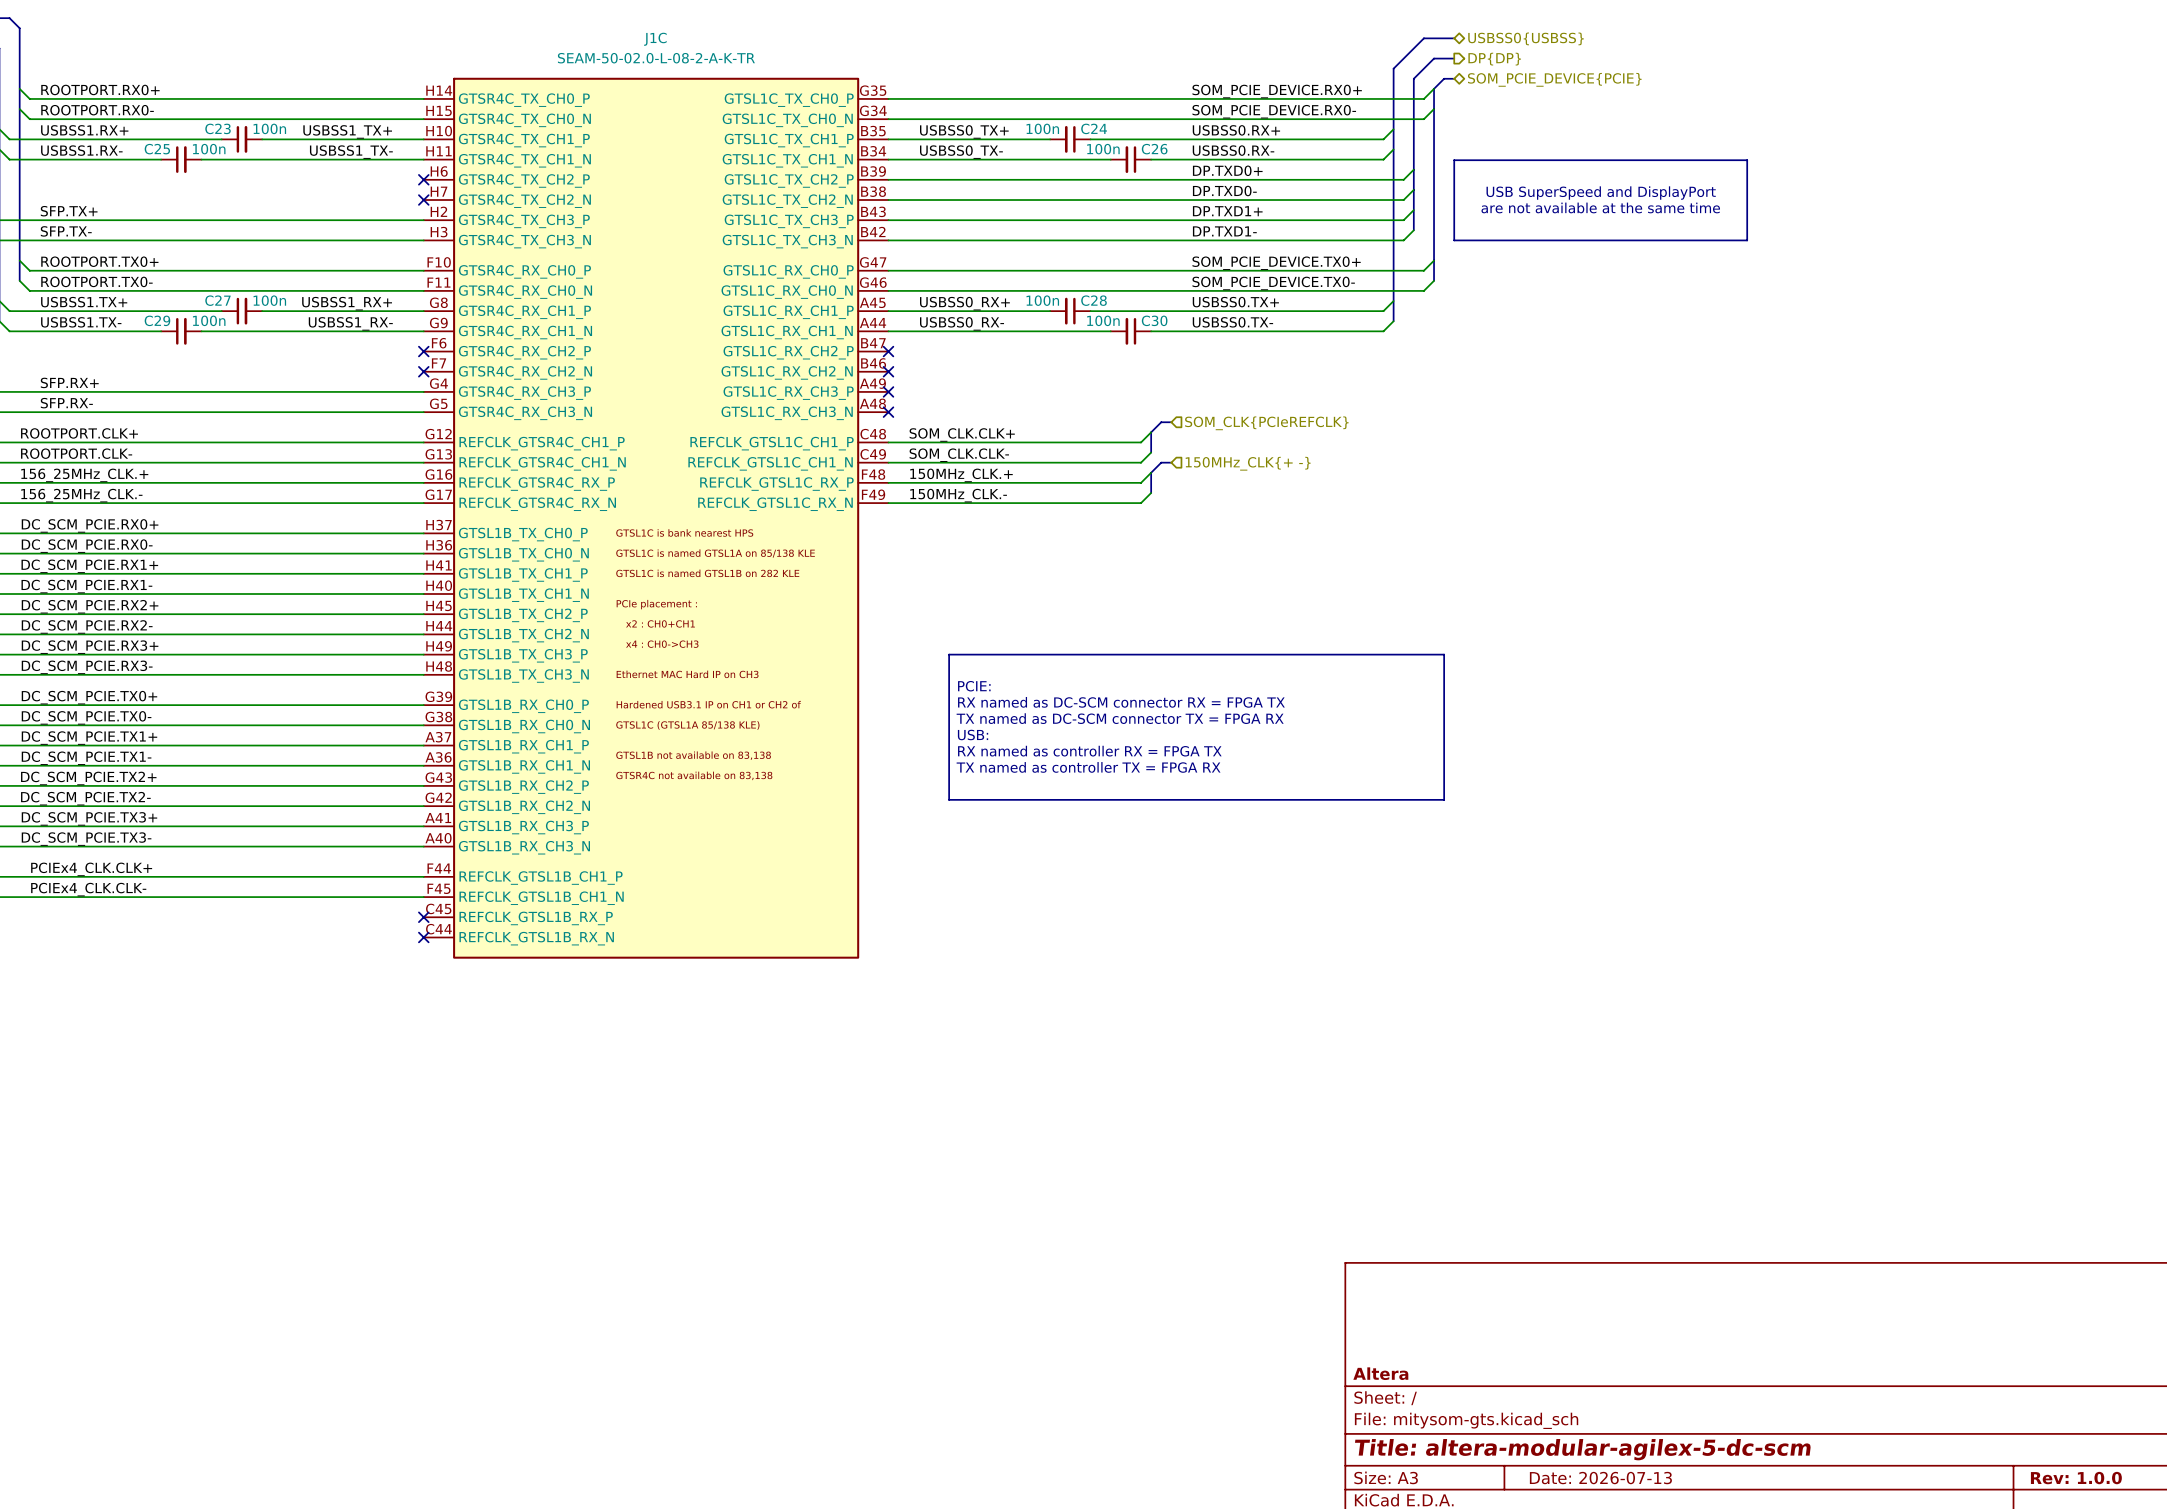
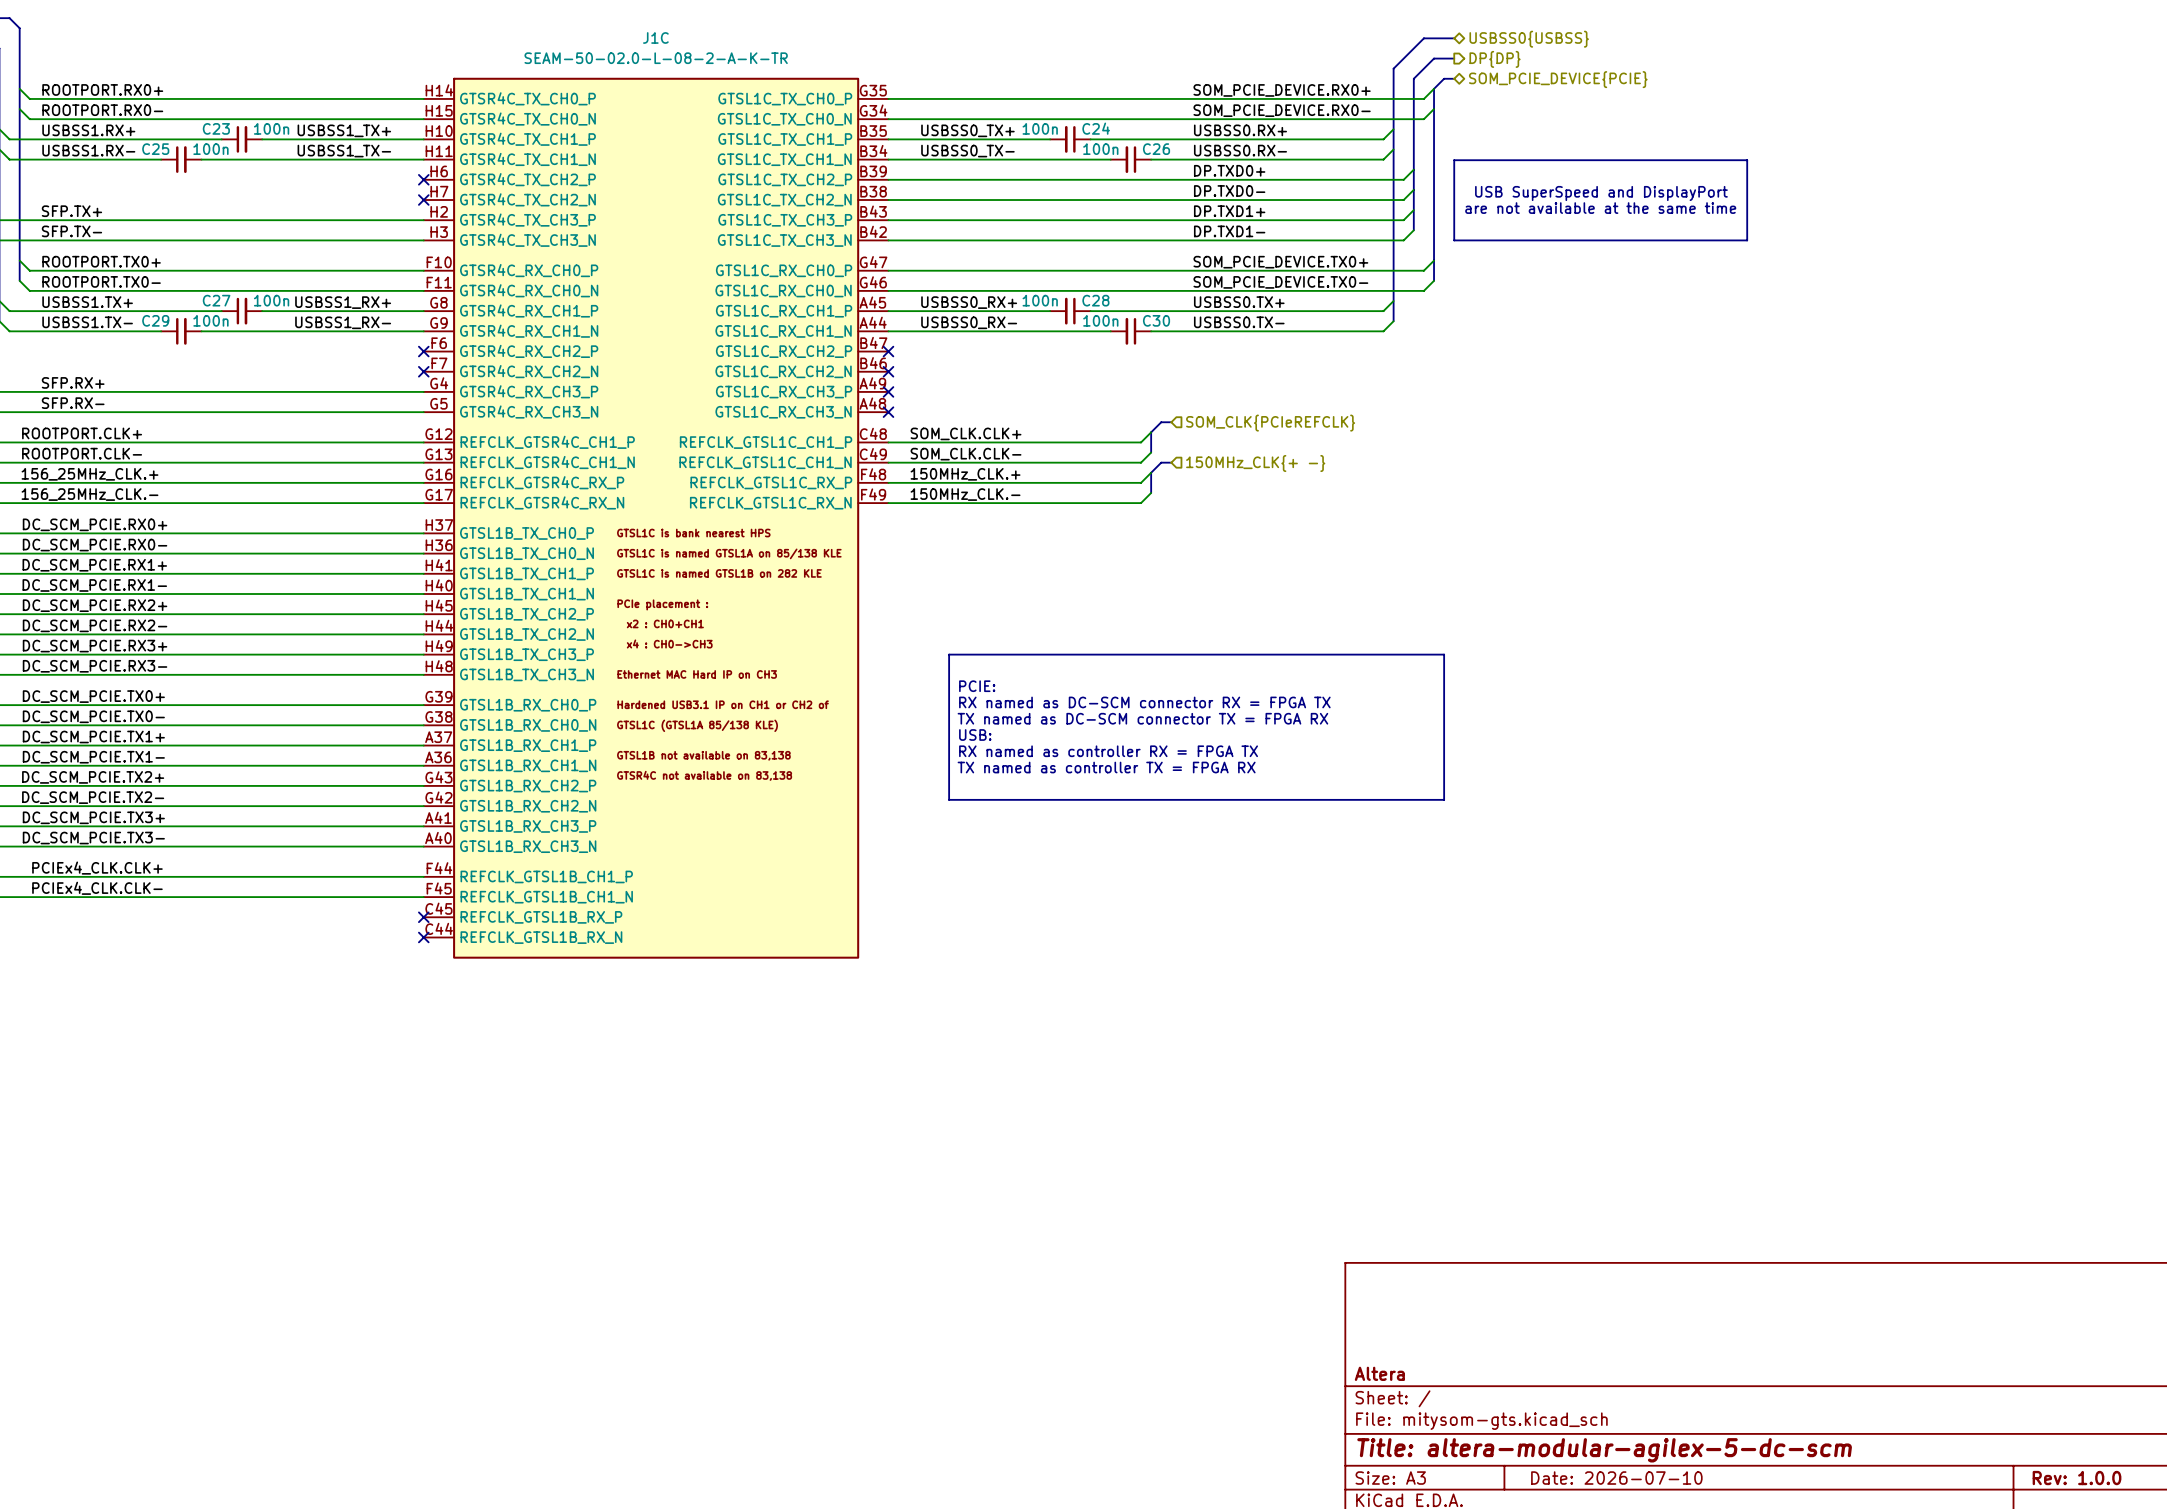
title block: Date: 2026-07-13 (1600, 1478) -> Date: 2026-07-10 (1616, 1478)

